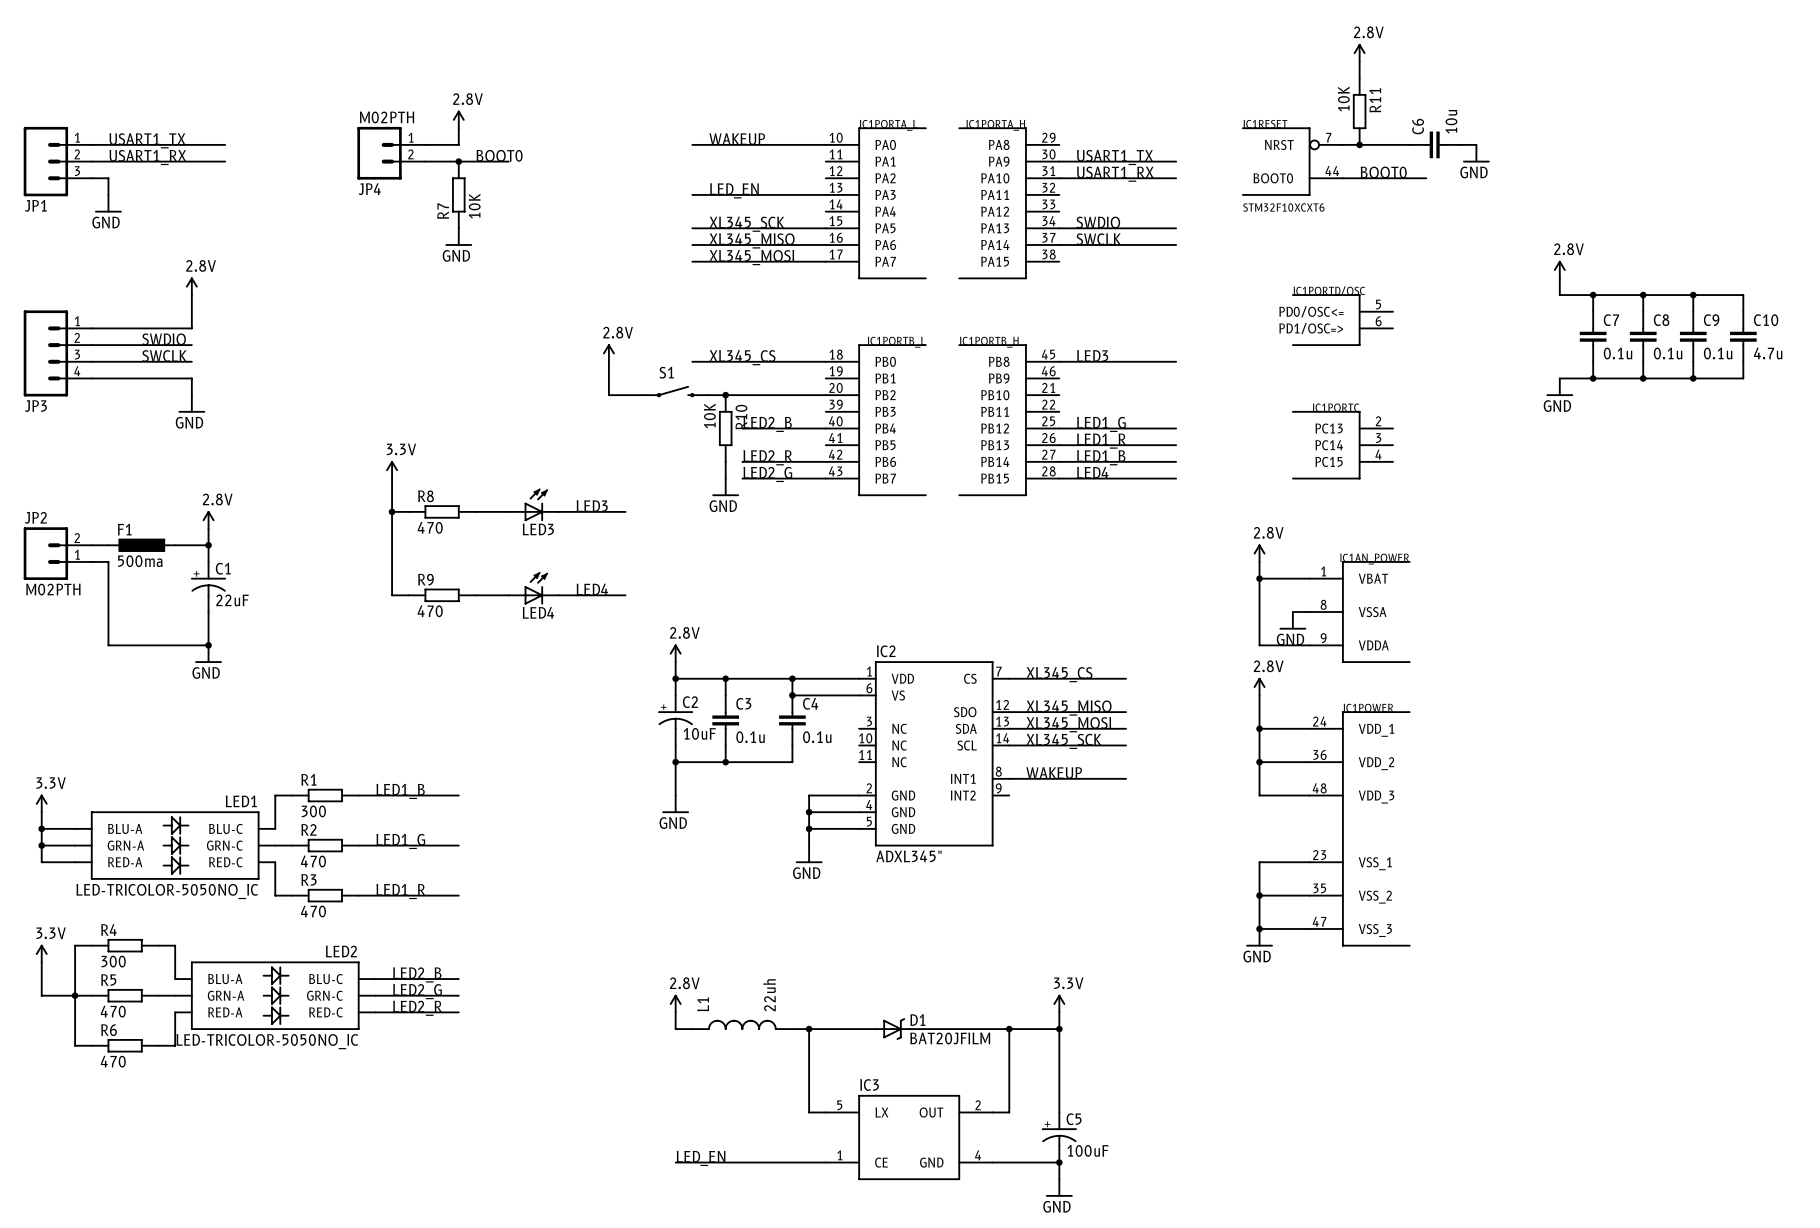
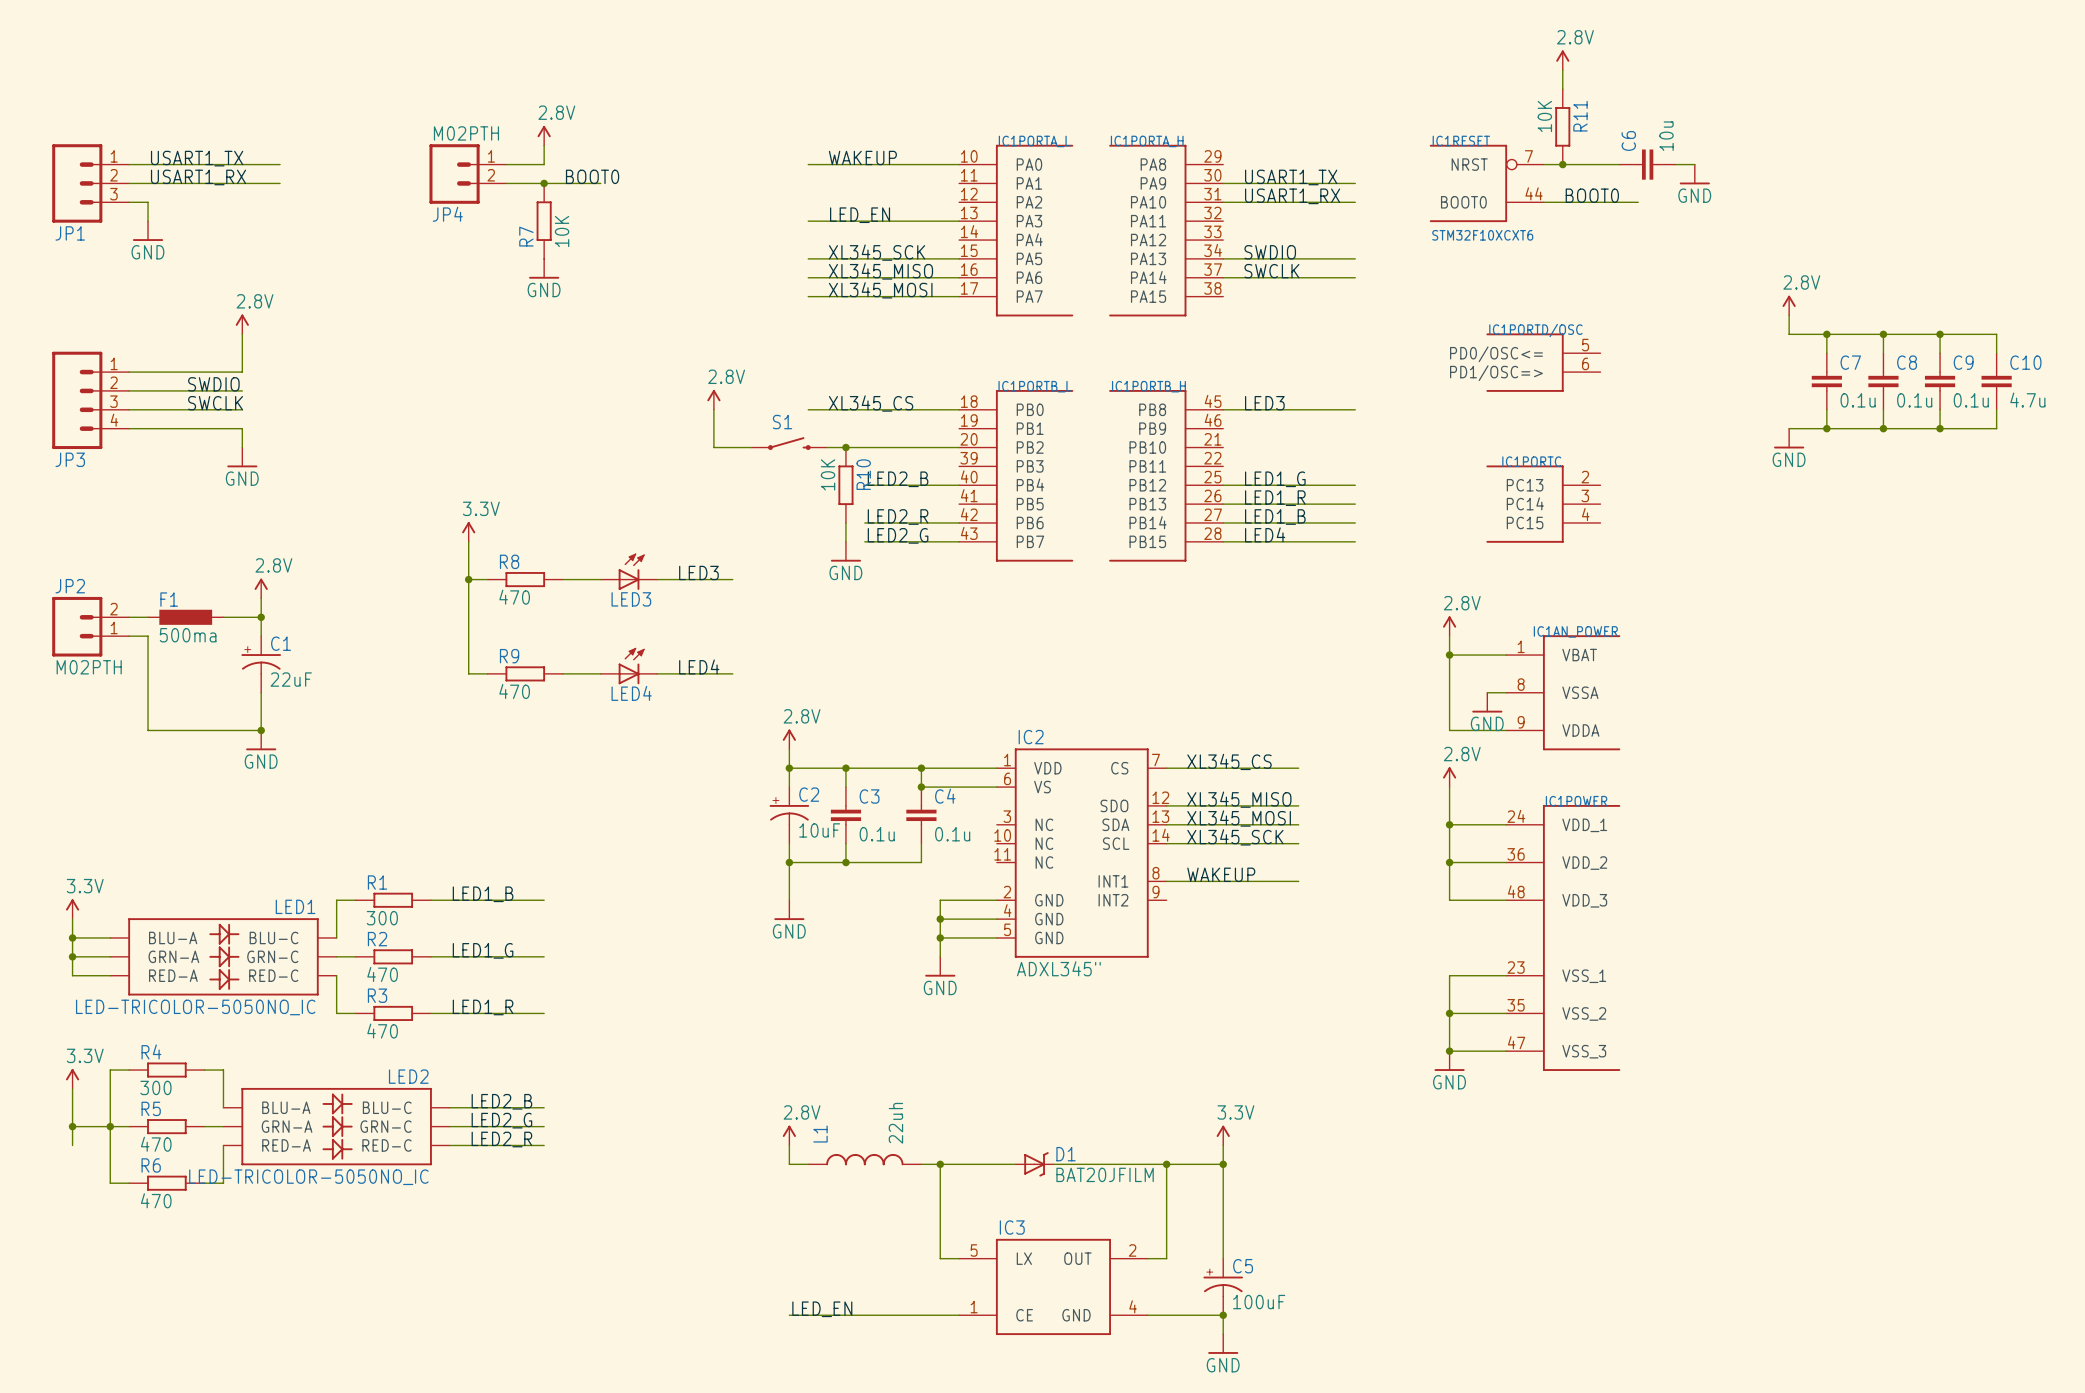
wire: none -> (72, 1126) (72, 1145)
junction: none -> (72, 1126)

